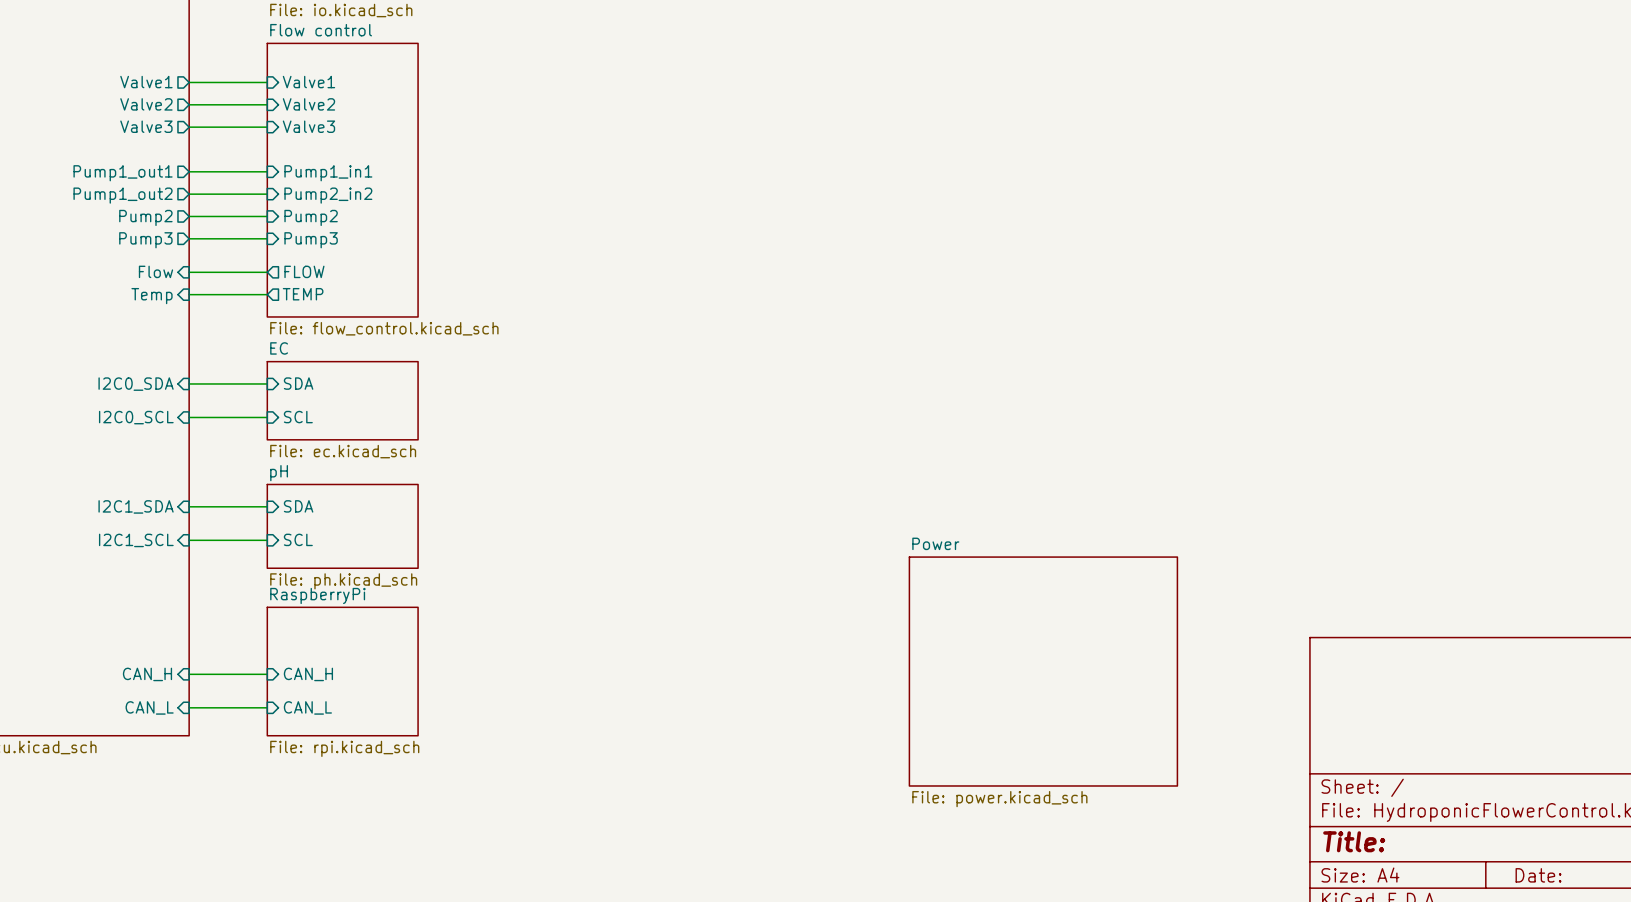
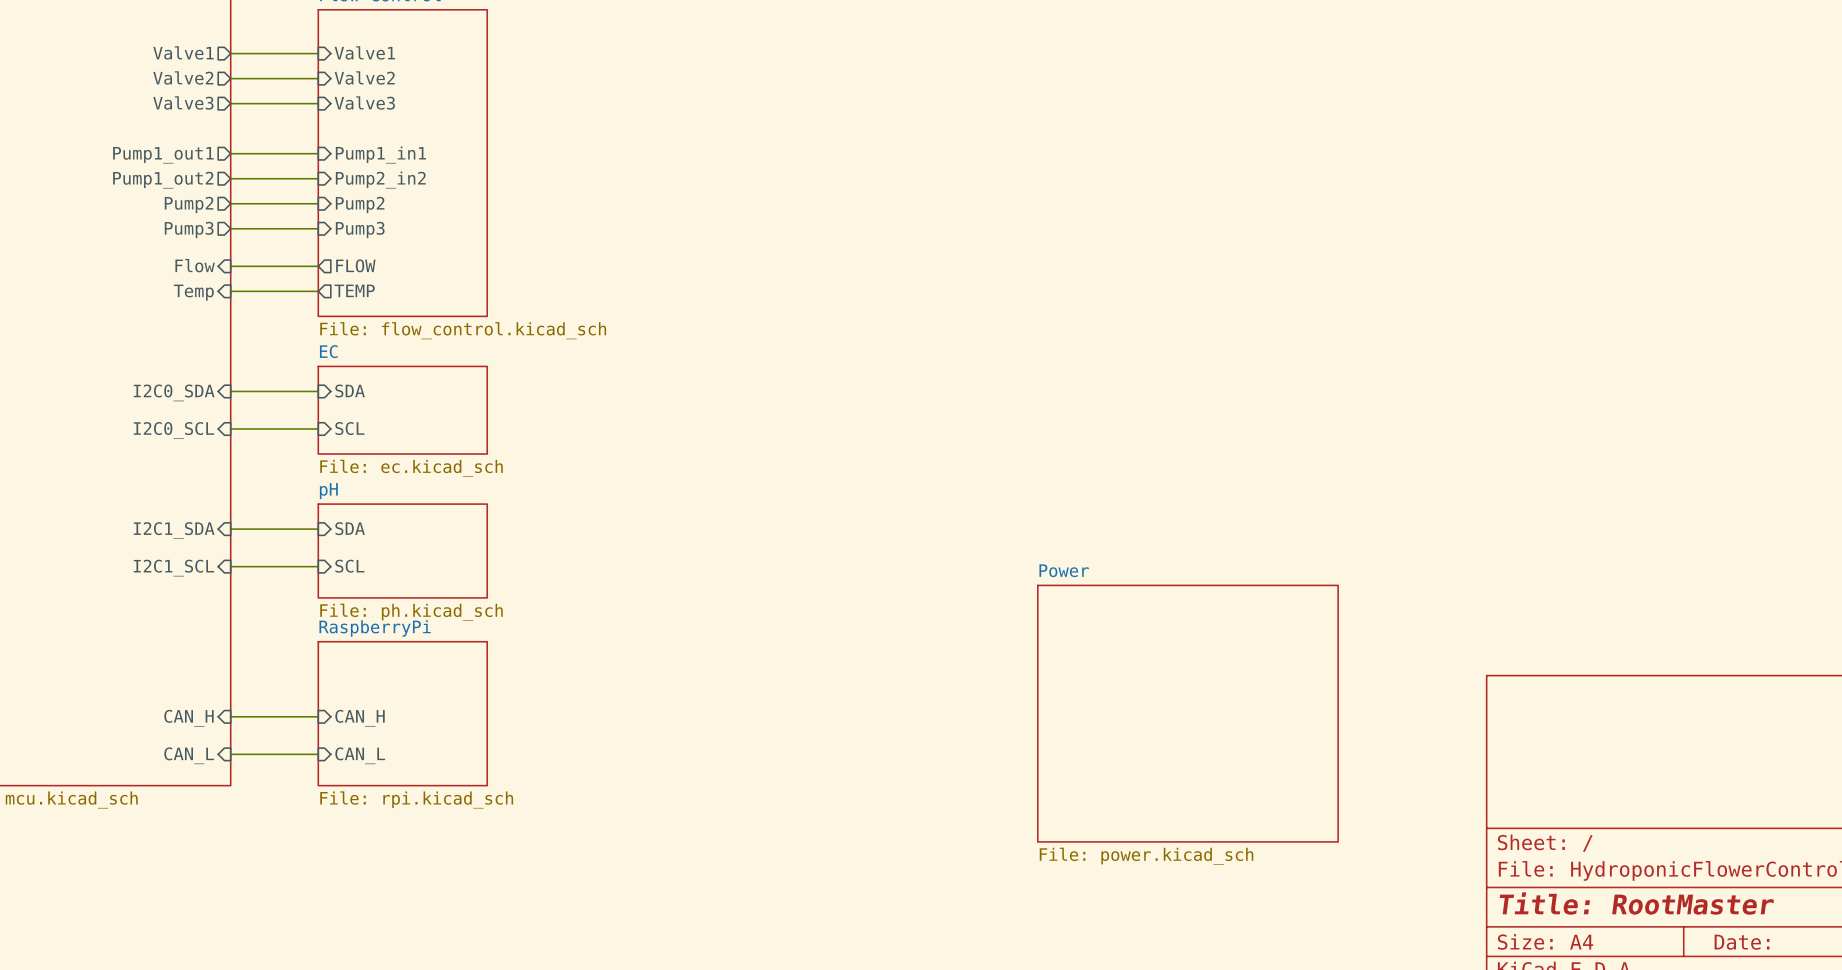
title block: Title: (1354, 841) -> Title: RootMaster (1636, 903)

